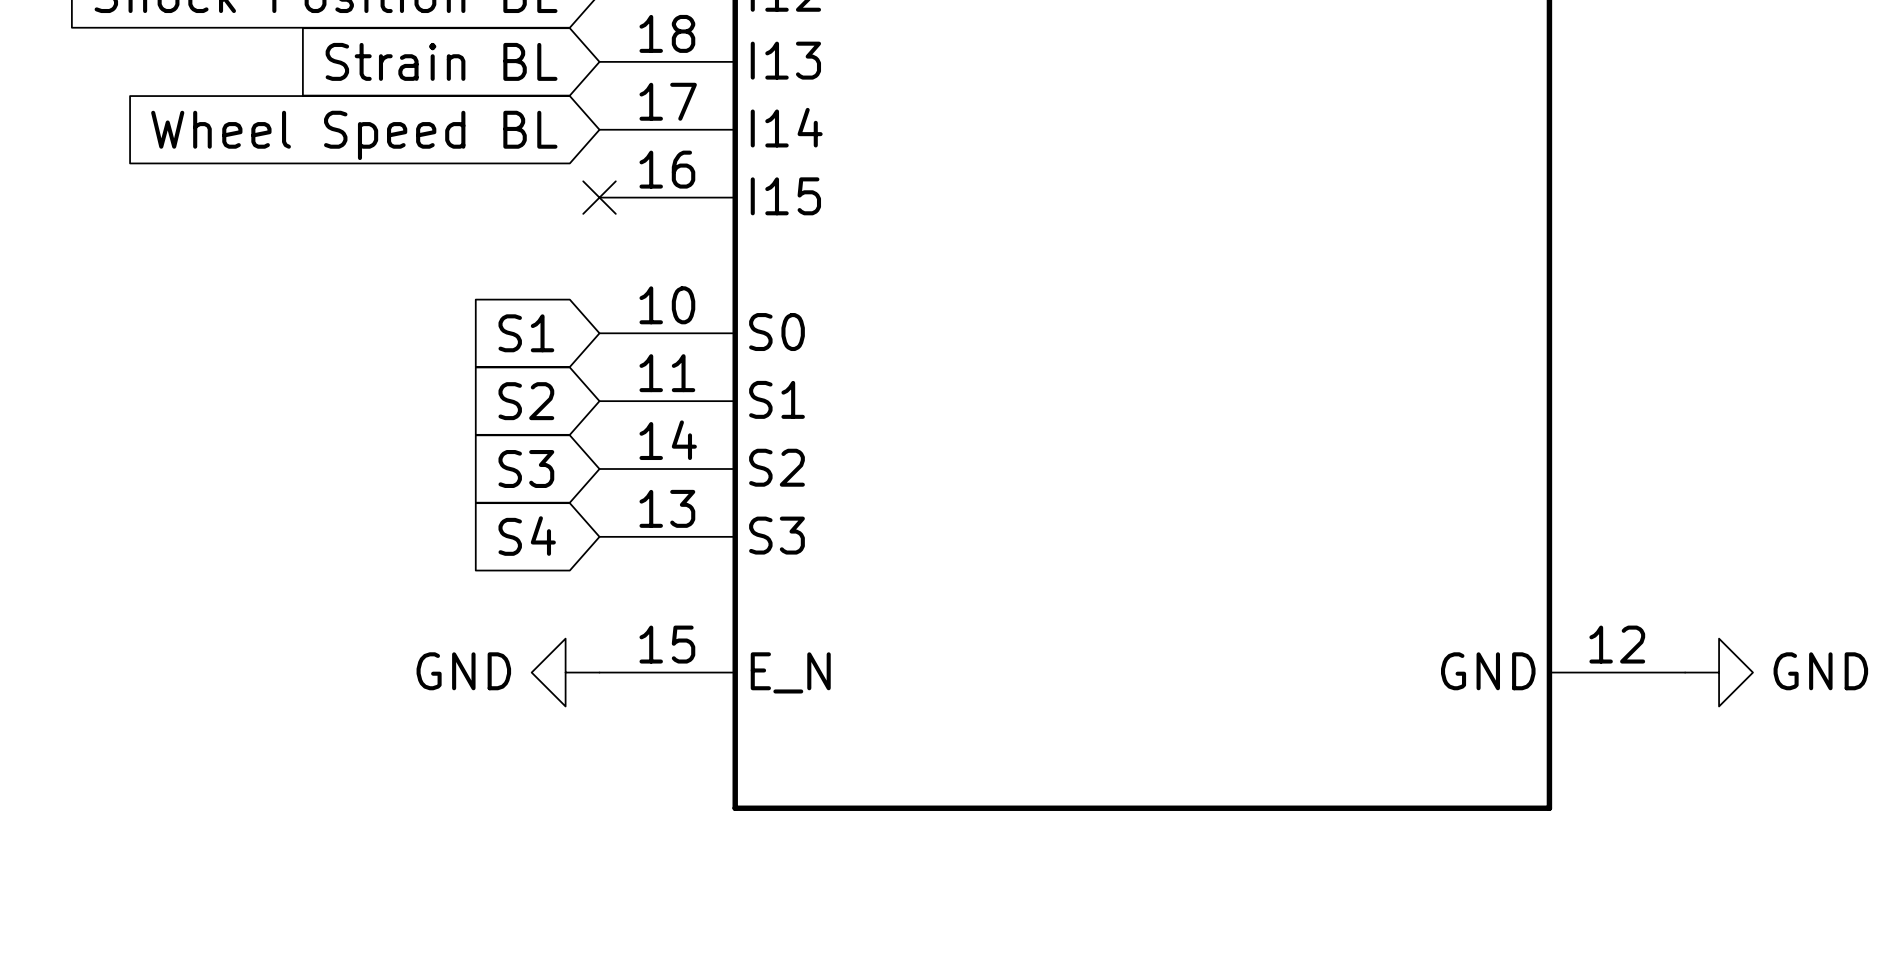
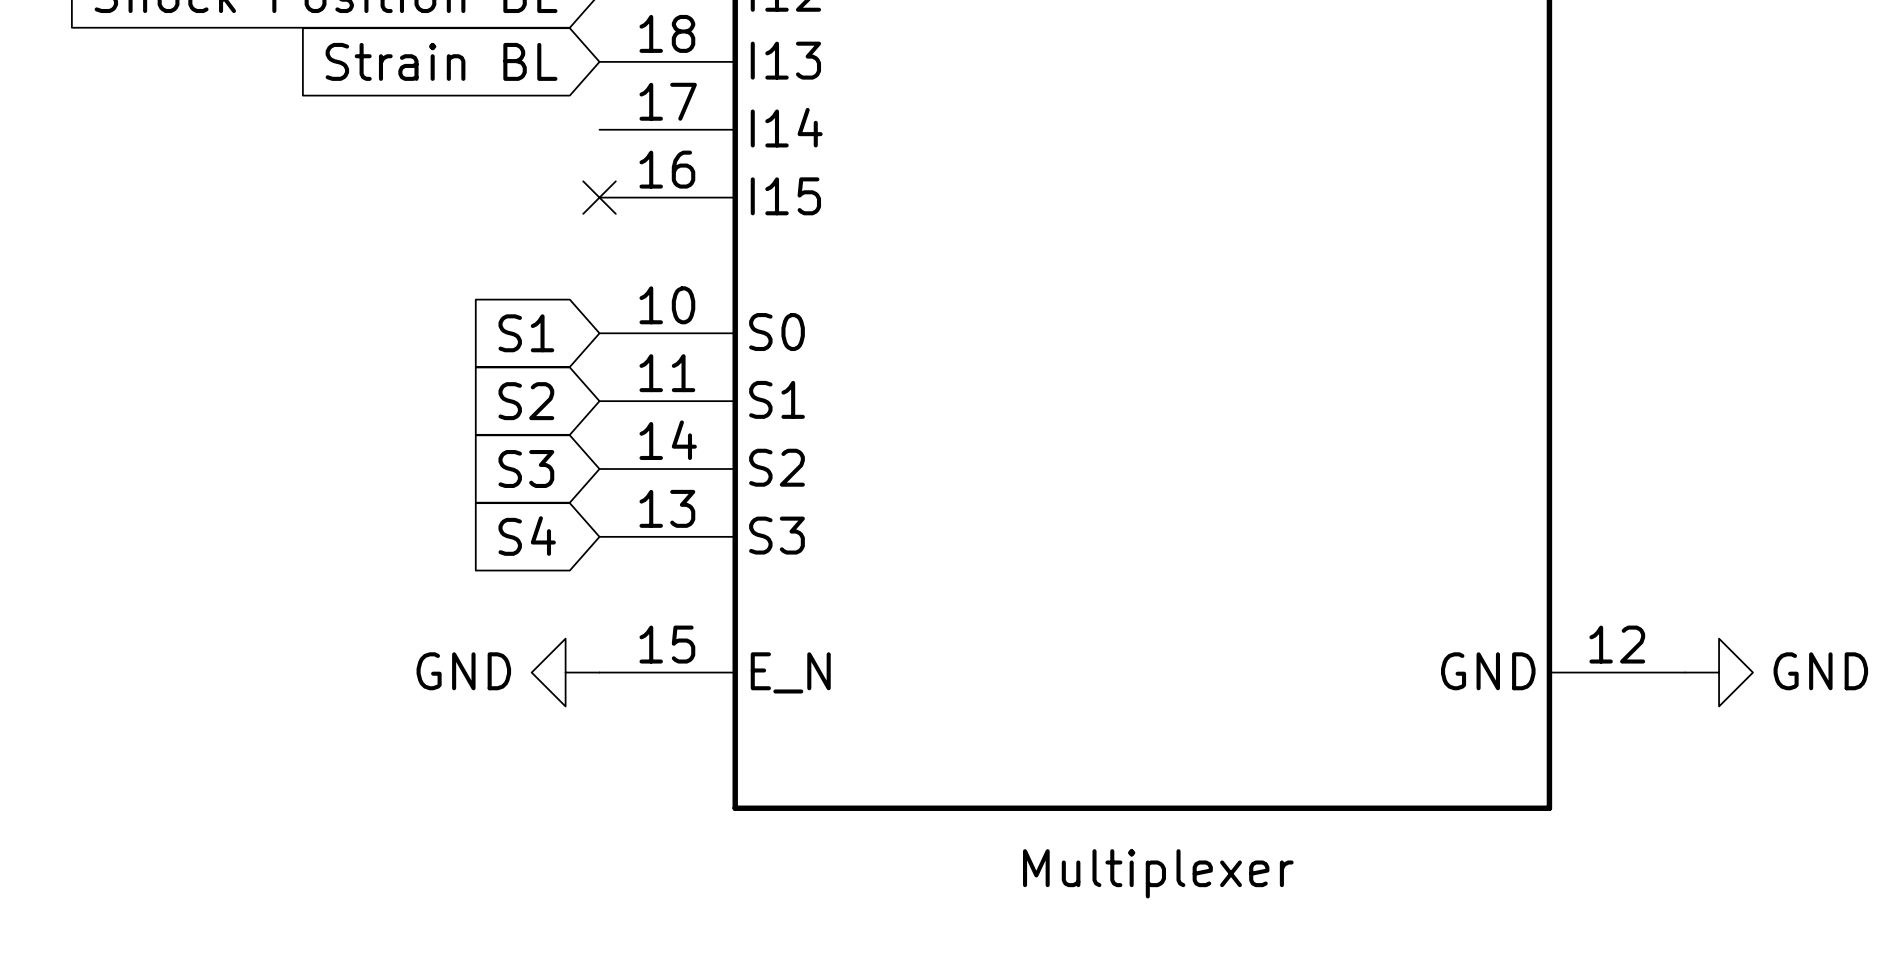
global label: Wheel Speed BL (354, 135) -> none
text: none -> Multiplexer (1158, 873)

